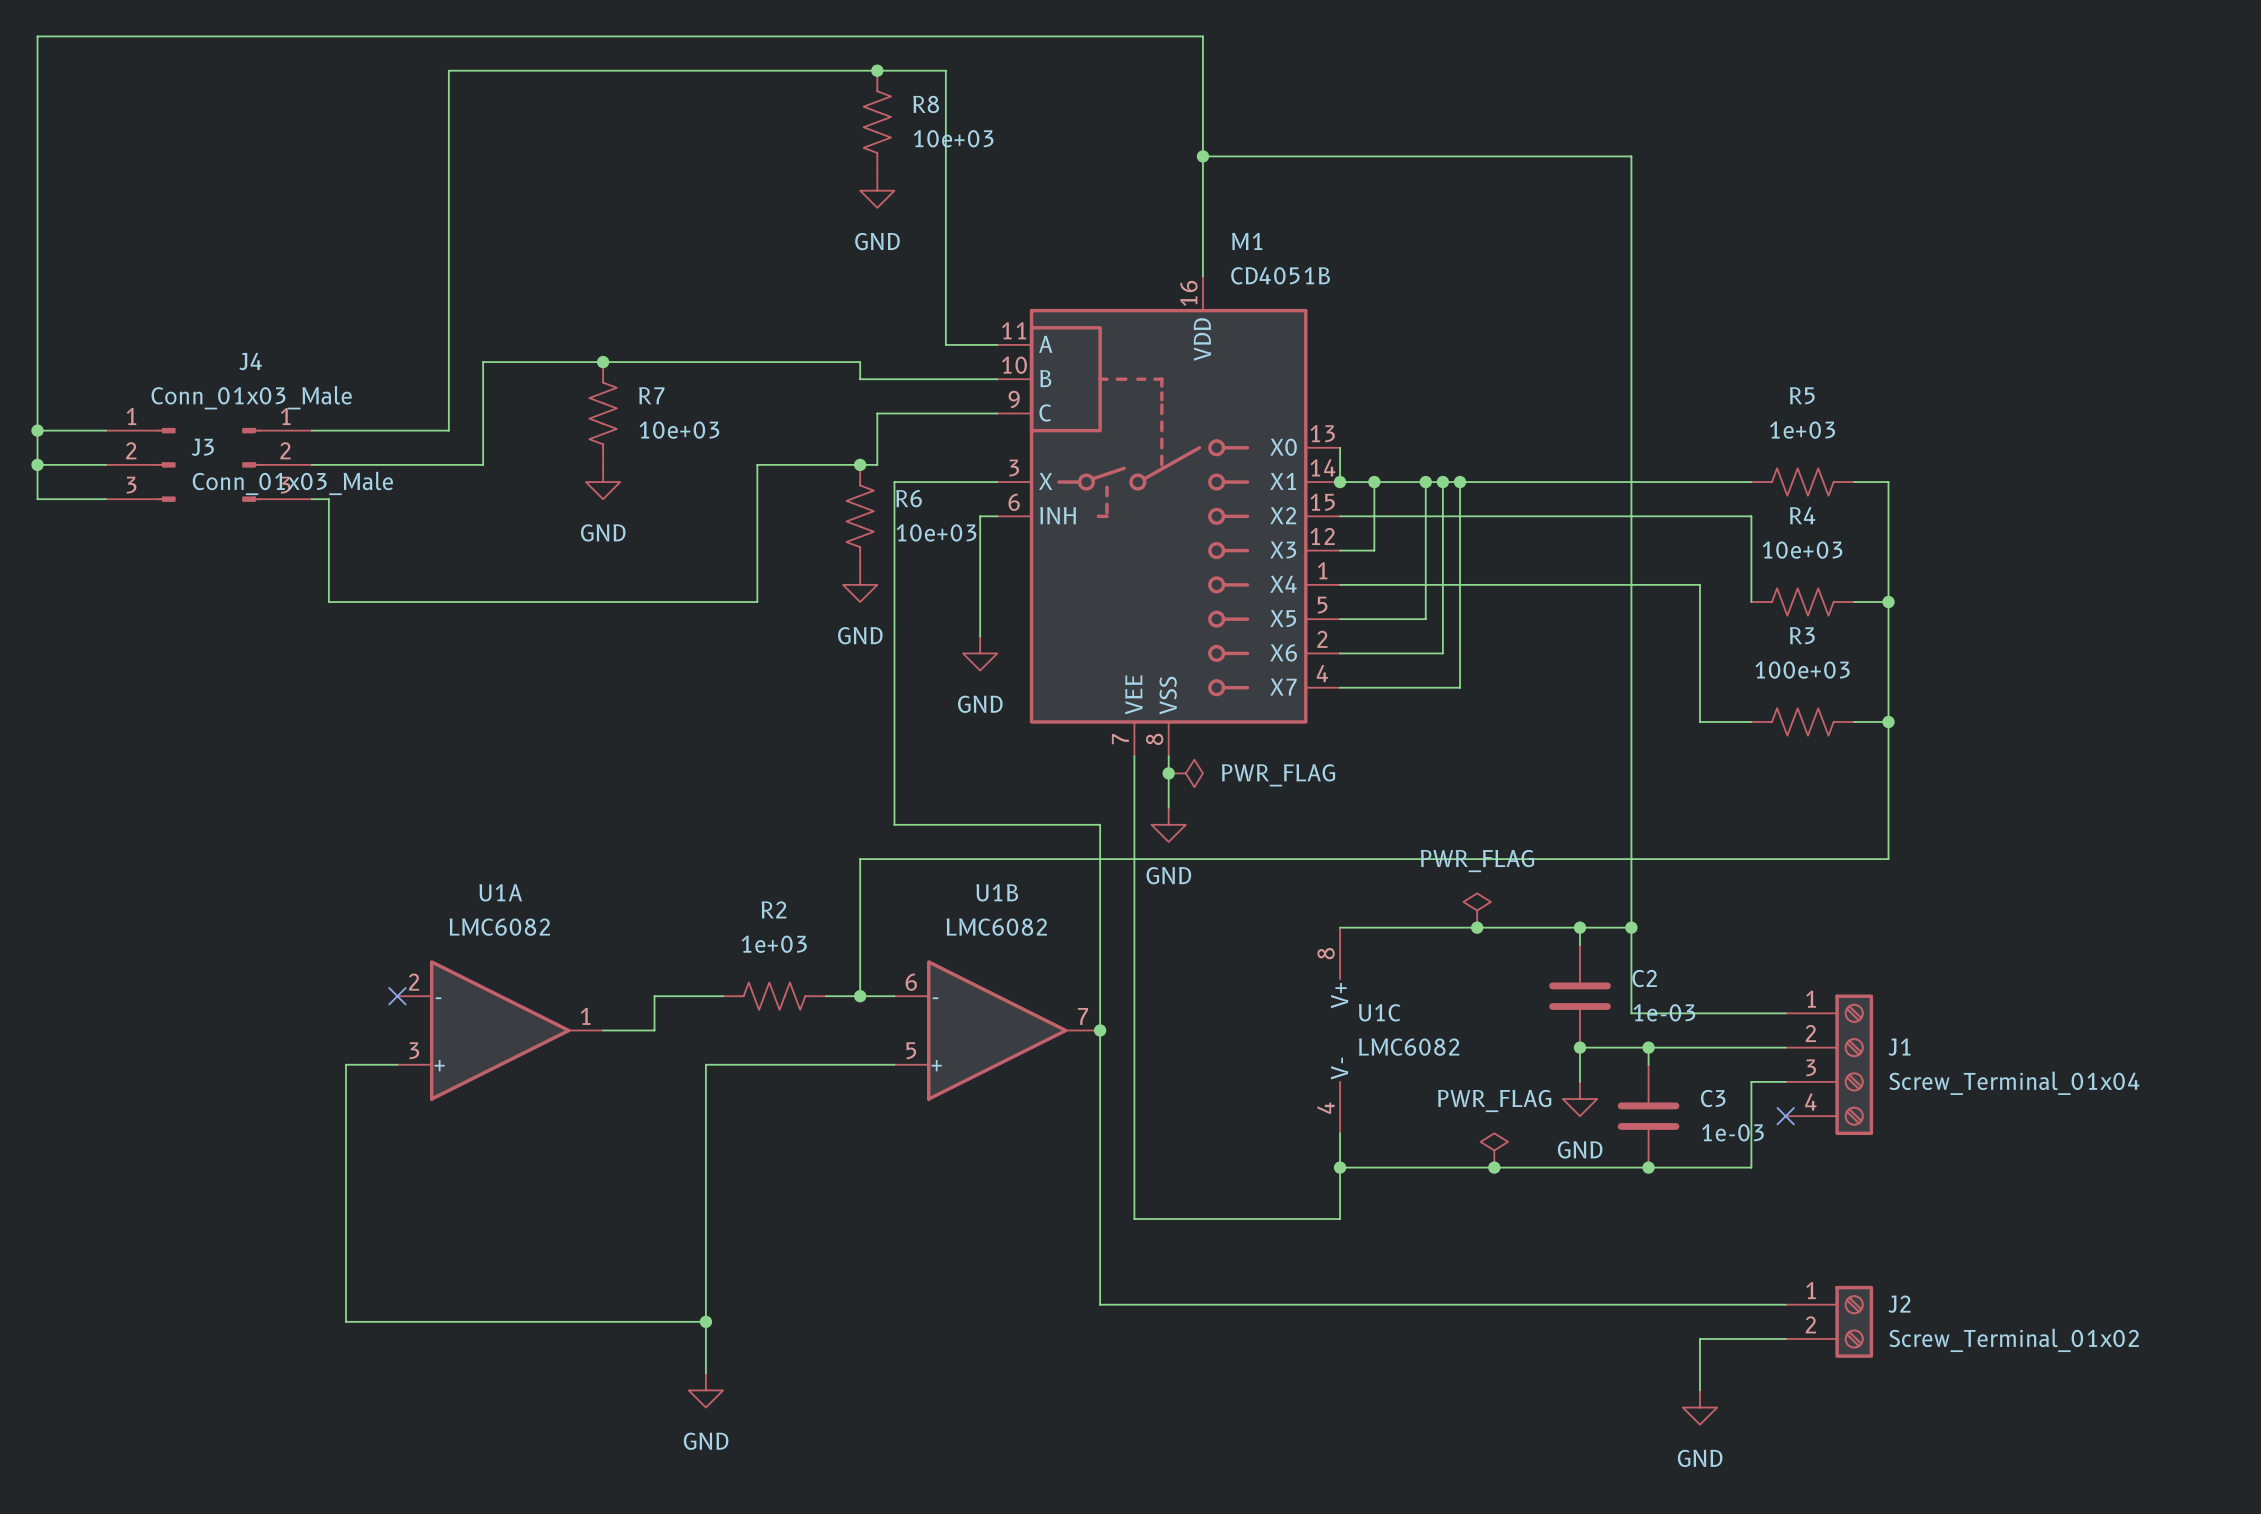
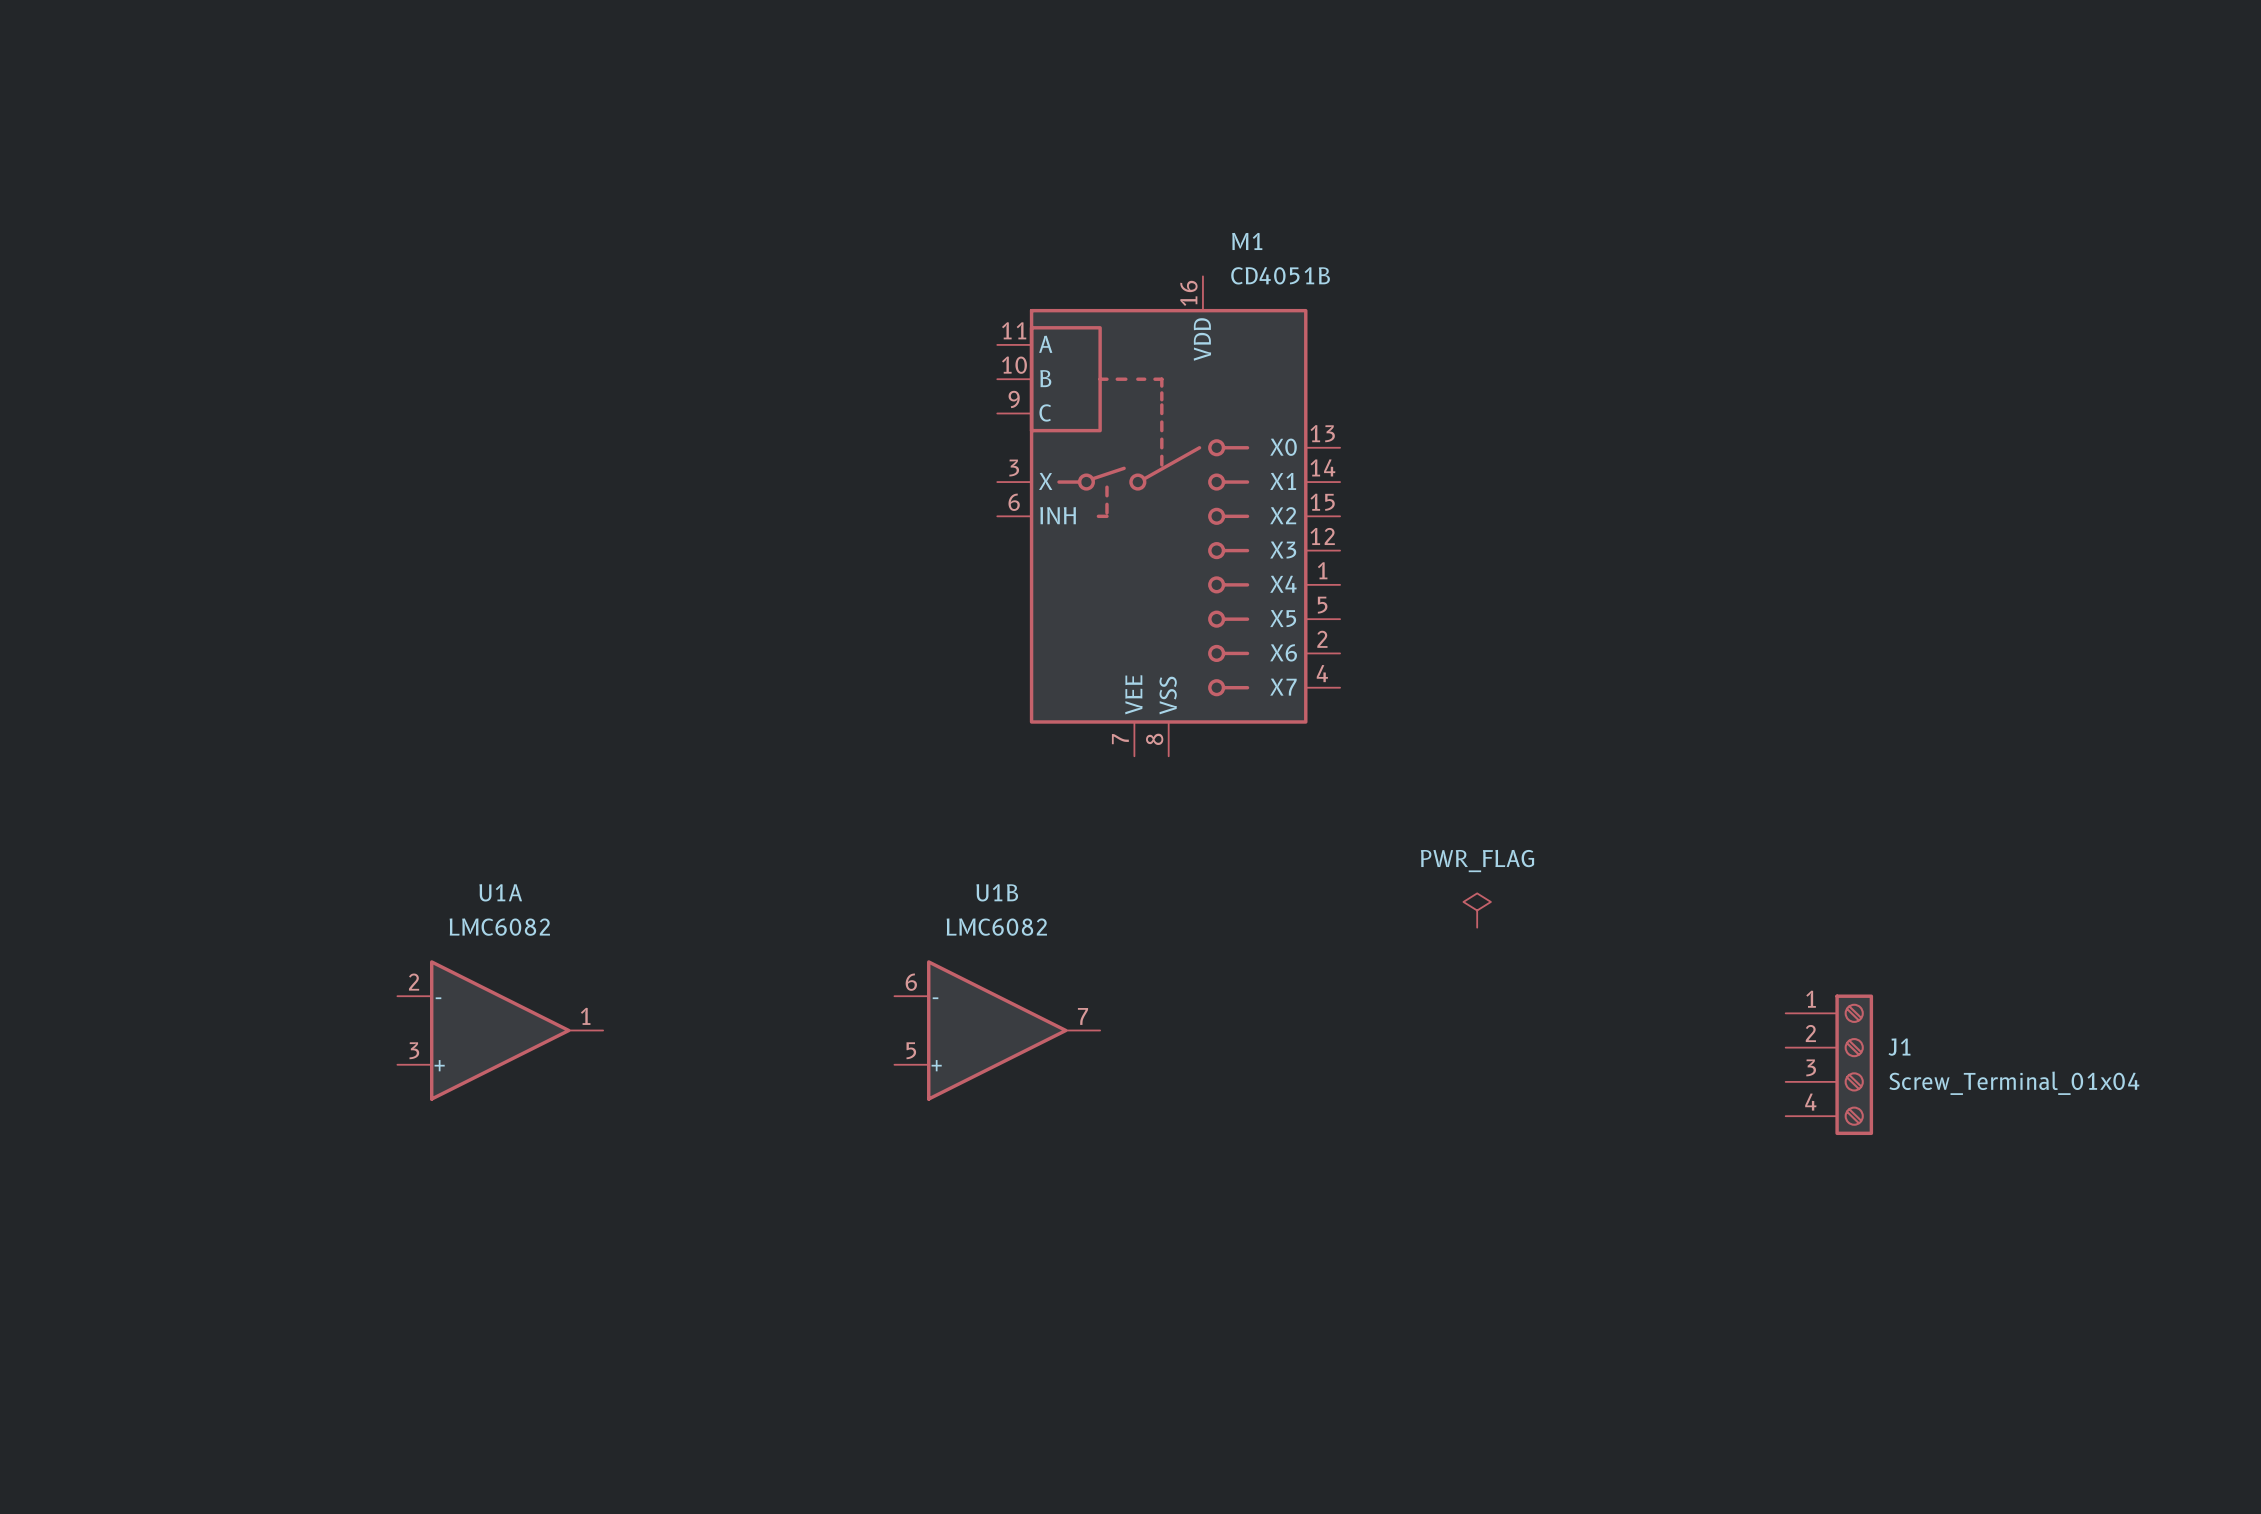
junction: (877, 70) -> none
R8: 10e+03 (877, 122) -> none
wire: (1202, 156) (1631, 156) (1631, 1013) (1785, 1013) -> none
junction: (1202, 156) -> none
power symbol: GND (877, 190) -> none
wire: (1202, 276) (1202, 36) (37, 36) (37, 499) (106, 499) -> none
wire: (997, 344) (945, 344) (945, 70) (448, 70) (448, 430) (311, 430) -> none
junction: (603, 362) -> none
wire: (997, 379) (860, 379) (860, 362) (483, 362) (483, 464) (311, 464) -> none
R7: 10e+03 (603, 413) -> none
wire: (997, 413) (877, 413) (877, 464) (757, 464) (757, 602) (328, 602) (328, 499) (311, 499) -> none
wire: (37, 430) (106, 430) -> none
junction: (37, 430) -> none
wire: (1340, 447) (1340, 482) (1751, 482) -> none
wire: (37, 464) (106, 464) -> none
junction: (37, 464) -> none
J3: Conn_01x03_Male (140, 464) -> none
J4: Conn_01x03_Male (276, 464) -> none
junction: (860, 464) -> none
power symbol: GND (603, 482) -> none
wire: (997, 482) (894, 482) (894, 824) (1100, 824) (1100, 1304) (1785, 1304) -> none
junction: (1340, 482) -> none
wire: (1374, 482) (1374, 550) (1340, 550) -> none
junction: (1374, 482) -> none
wire: (1425, 482) (1425, 619) (1340, 619) -> none
junction: (1425, 482) -> none
wire: (1442, 482) (1442, 653) (1340, 653) -> none
junction: (1442, 482) -> none
wire: (1460, 482) (1460, 687) (1340, 687) -> none
junction: (1460, 482) -> none
R5: 1e+03 (1802, 482) -> none
wire: (1854, 482) (1888, 482) (1888, 859) (860, 859) (860, 996) -> none
R6: 10e+03 (860, 516) -> none
wire: (997, 516) (980, 516) (980, 636) -> none
wire: (1340, 516) (1751, 516) (1751, 602) -> none
power symbol: GND (860, 584) -> none
wire: (1340, 584) (1699, 584) (1699, 721) (1751, 721) -> none
R4: 10e+03 (1802, 602) -> none
wire: (1854, 602) (1888, 602) -> none
junction: (1888, 602) -> none
power symbol: GND (980, 653) -> none
R3: 100e+03 (1802, 721) -> none
wire: (1854, 721) (1888, 721) -> none
junction: (1888, 721) -> none
wire: (1134, 756) (1134, 1219) (1340, 1219) (1340, 1133) -> none
wire: (1168, 756) (1168, 807) -> none
junction: (1168, 773) -> none
power symbol: PWR_FLAG (1185, 773) -> none
power symbol: GND (1168, 824) -> none
wire: (1340, 927) (1631, 927) -> none
junction: (1477, 927) -> none
wire: (1580, 927) (1580, 944) -> none
junction: (1580, 927) -> none
junction: (1631, 927) -> none
no-connect mark: (397, 996) -> none
wire: (723, 996) (654, 996) (654, 1030) (603, 1030) -> none
R2: 1e+03 (774, 996) -> none
wire: (825, 996) (894, 996) -> none
junction: (860, 996) -> none
C2: 1e-03 (1580, 996) -> none
junction: (1100, 1030) -> none
U1C: LMC6082 (1340, 1030) -> none
junction: (1580, 1047) -> none
wire: (1648, 1047) (1648, 1064) -> none
junction: (1648, 1047) -> none
wire: (1785, 1047) (1580, 1047) (1580, 1081) -> none
wire: (397, 1064) (346, 1064) (346, 1321) (705, 1321) -> none
wire: (894, 1064) (705, 1064) (705, 1373) -> none
wire: (1785, 1081) (1751, 1081) (1751, 1167) (1340, 1167) -> none
power symbol: GND (1580, 1099) -> none
C3: 1e-03 (1648, 1116) -> none
no-connect mark: (1785, 1116) -> none
power symbol: PWR_FLAG (1494, 1150) -> none
junction: (1340, 1167) -> none
junction: (1494, 1167) -> none
junction: (1648, 1167) -> none
junction: (705, 1321) -> none
J2: Screw_Terminal_01x02 (1829, 1321) -> none
wire: (1785, 1338) (1699, 1338) (1699, 1390) -> none
power symbol: GND (705, 1390) -> none
power symbol: GND (1699, 1407) -> none

